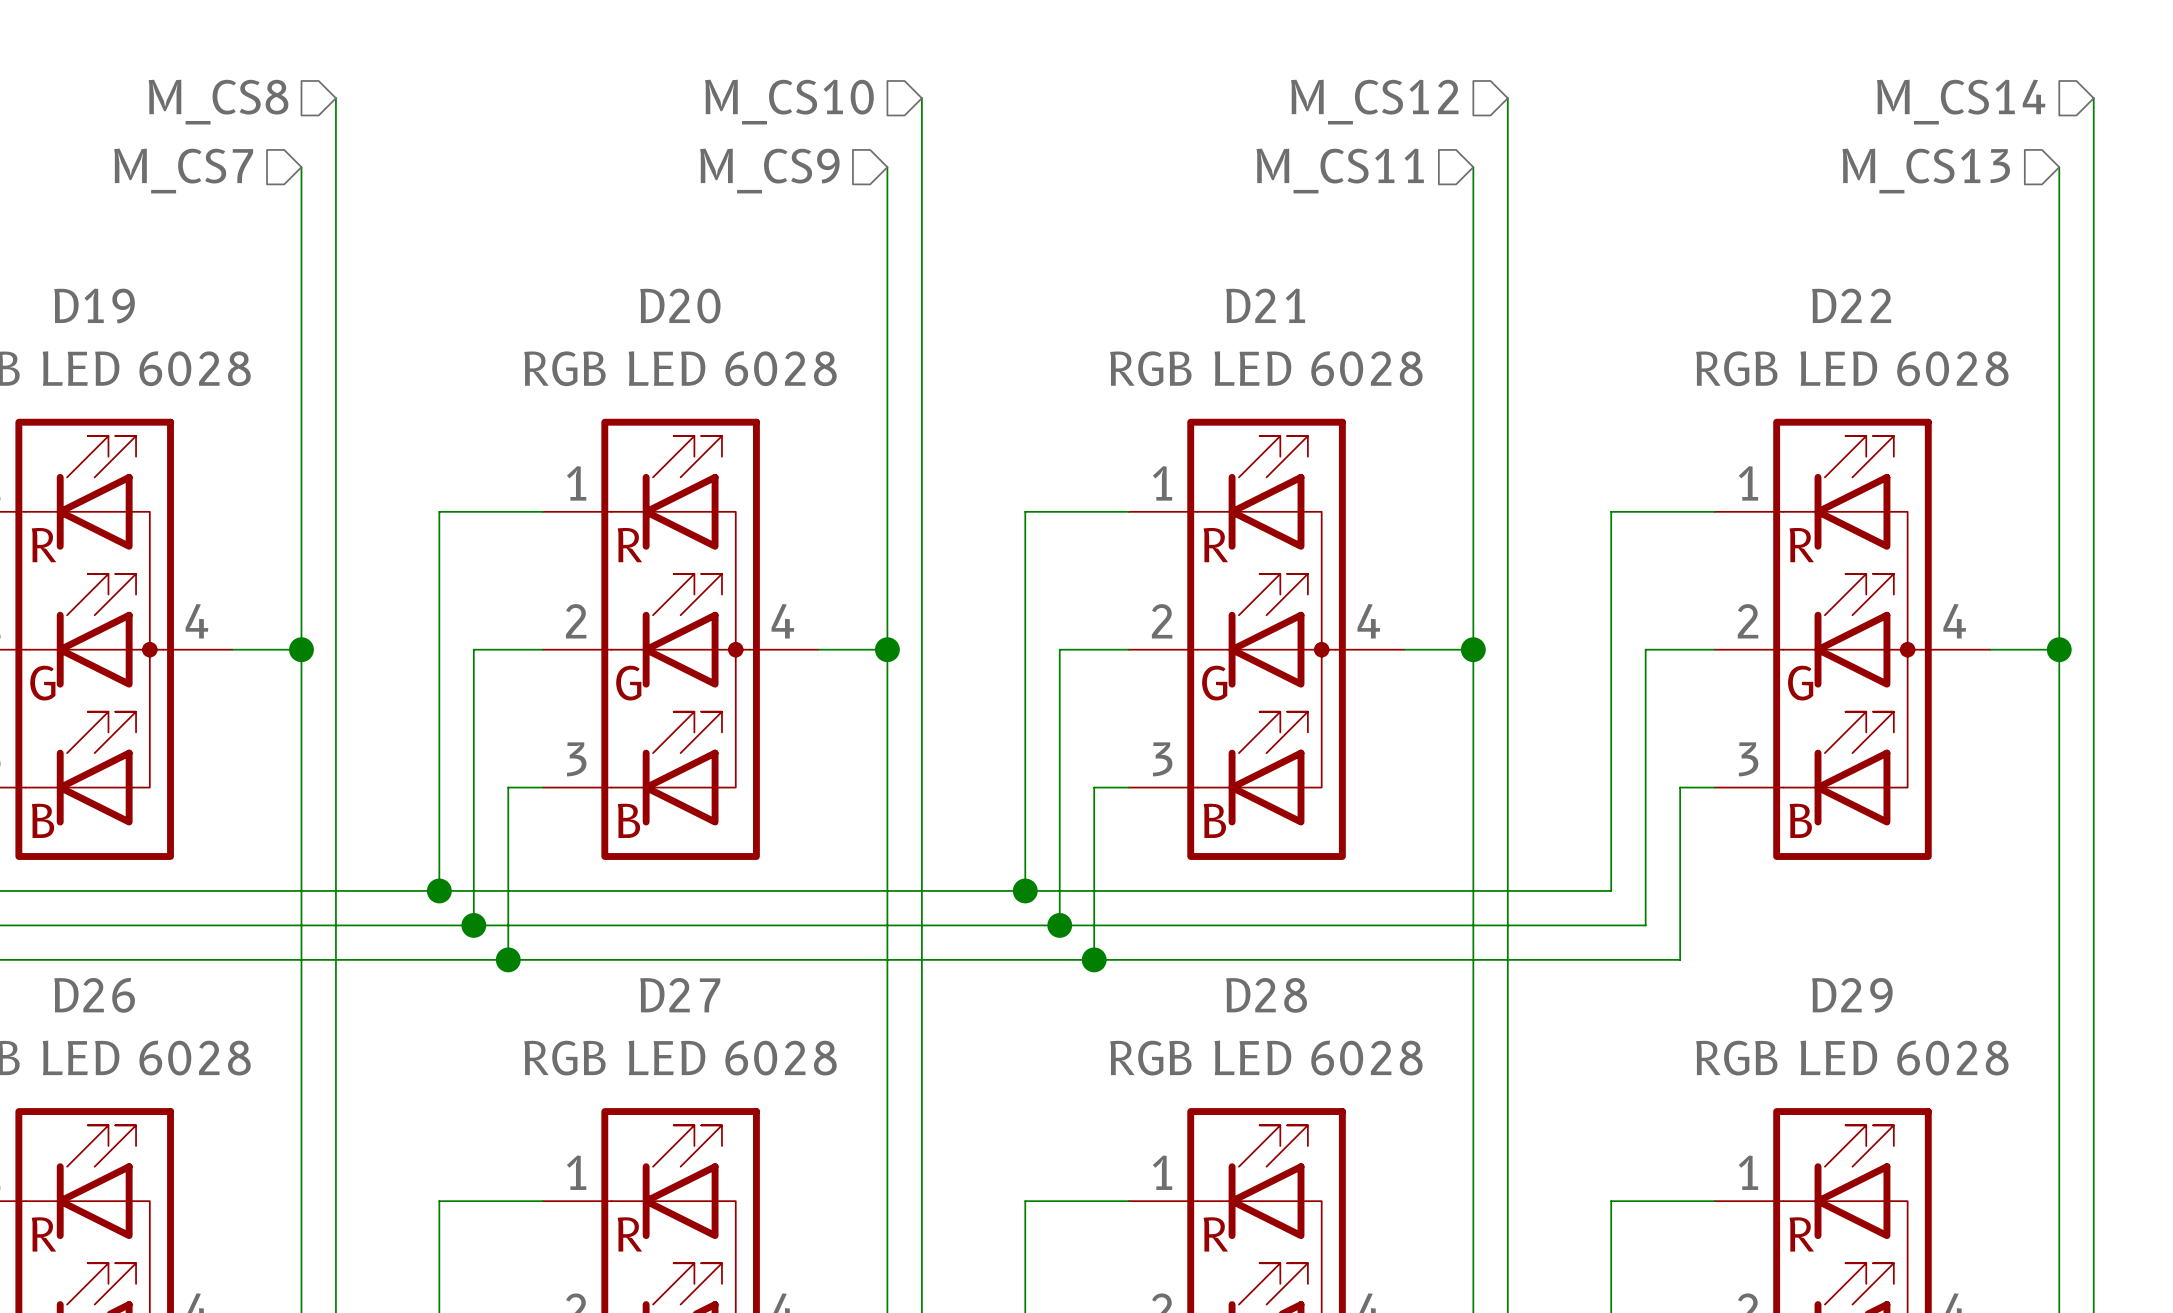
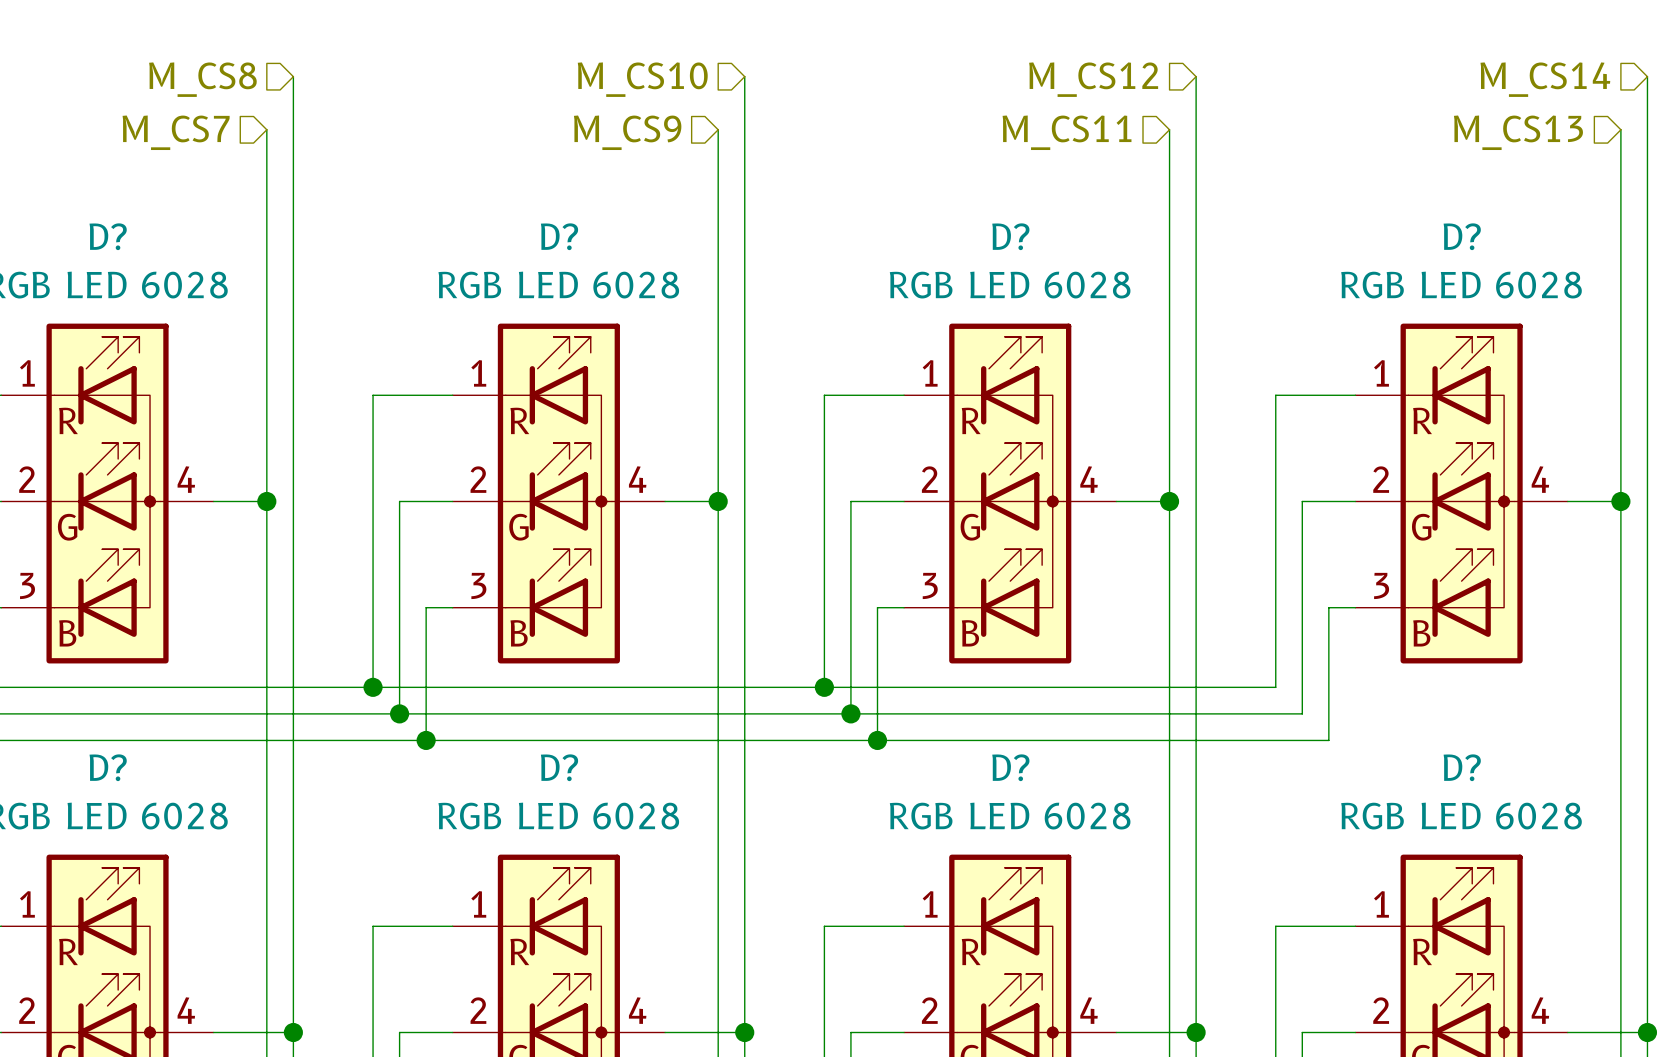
D21 name: D21 (1265, 305) -> D? (1010, 236)
D22 name: D22 (1851, 305) -> D? (1462, 236)
D19 name: D19 (94, 306) -> D? (108, 236)
D20 name: D20 (680, 306) -> D? (559, 236)
D26 name: D26 (94, 995) -> D? (108, 767)
D27 name: D27 (680, 995) -> D? (559, 767)
D28 name: D28 (1266, 995) -> D? (1010, 767)
D29 name: D29 (1852, 995) -> D? (1462, 767)

